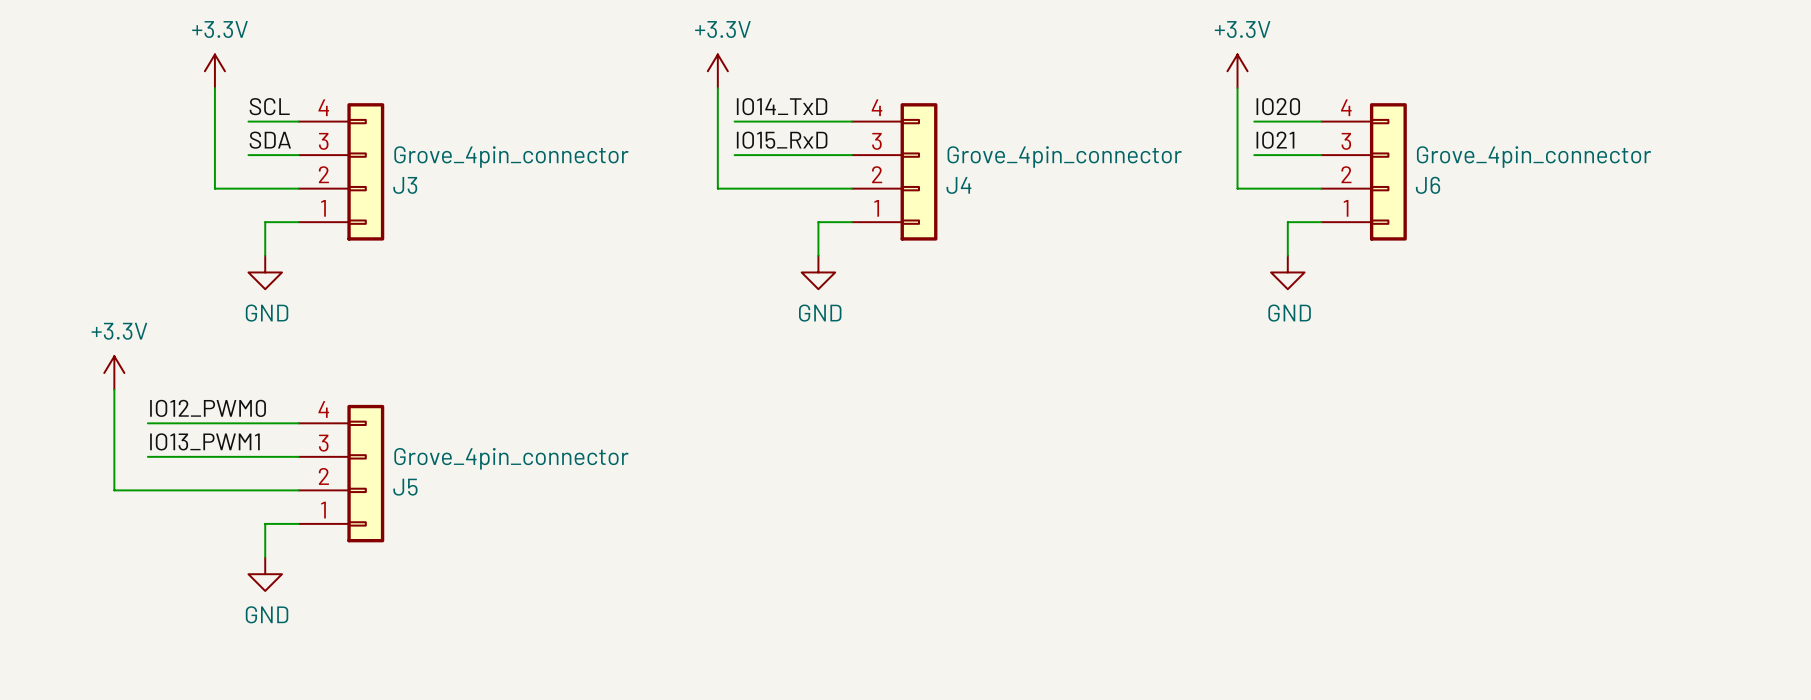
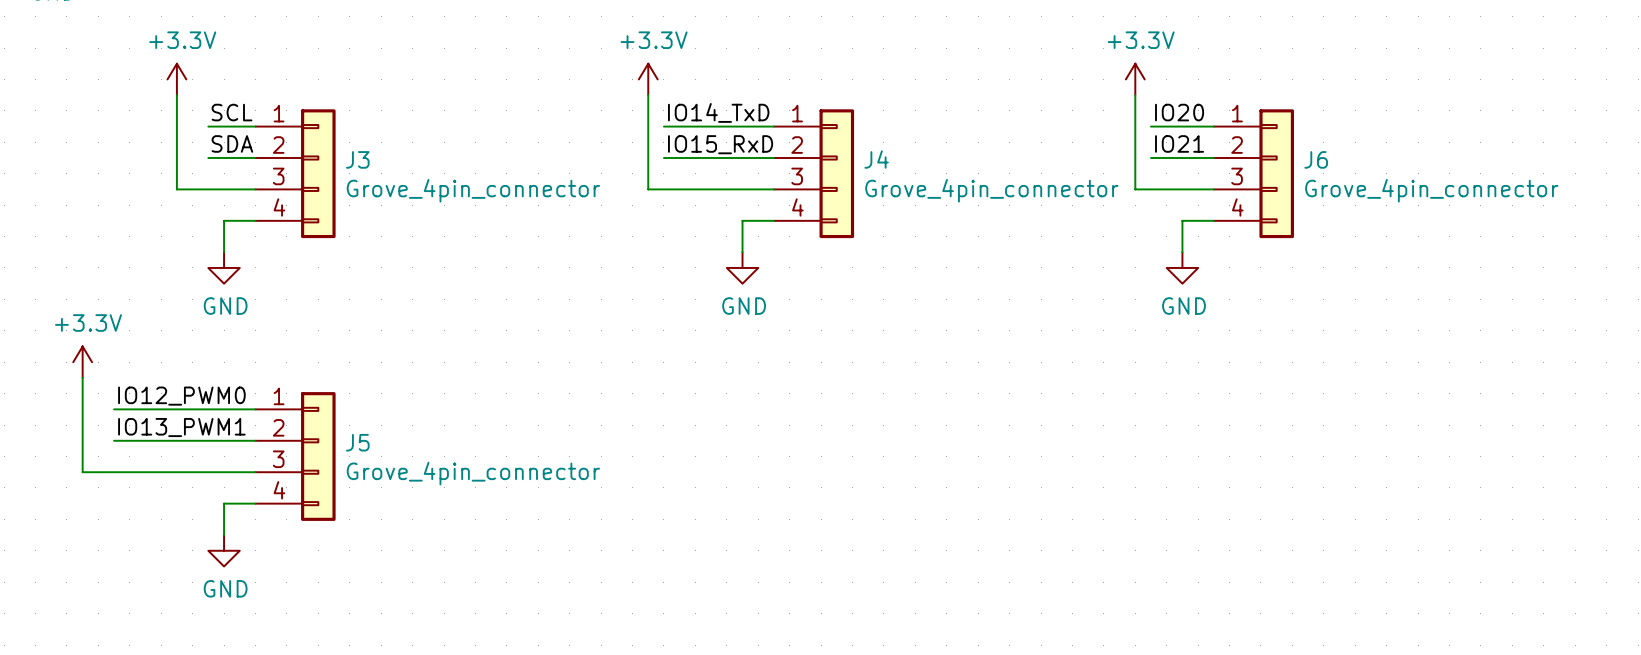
J3 flip: as is (365, 171) -> up-down (318, 173)
J4 flip: as is (919, 171) -> up-down (836, 173)
J6 flip: as is (1388, 171) -> up-down (1276, 173)
J5 flip: as is (365, 473) -> up-down (318, 456)

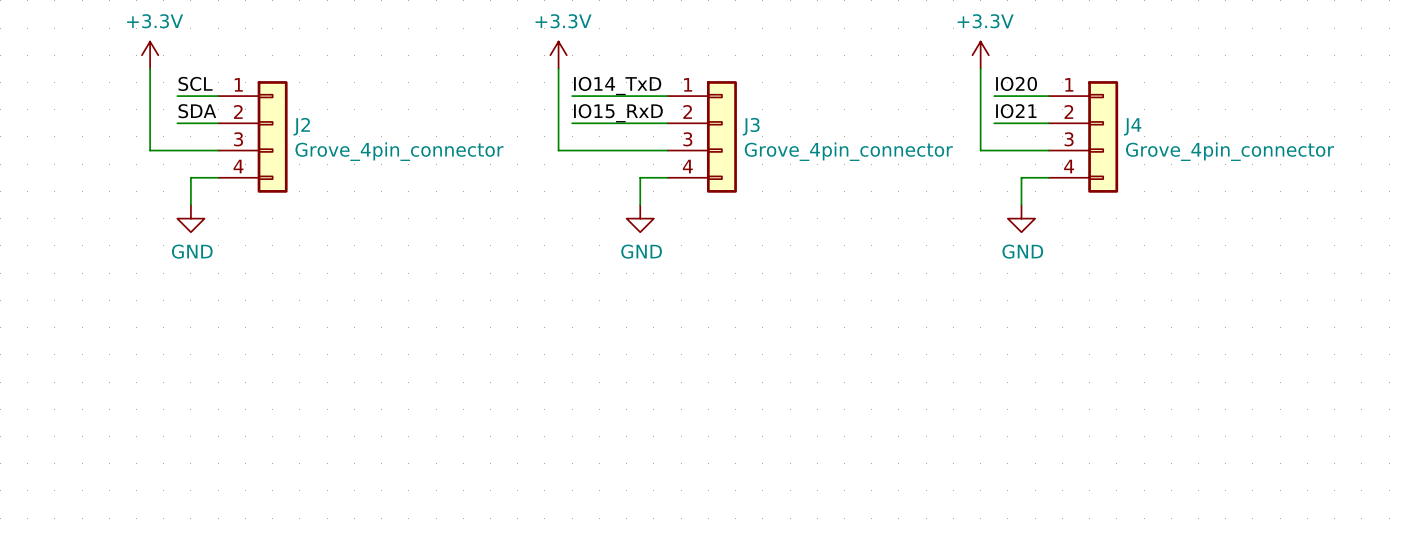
J3 name: J3 (357, 159) -> J2 (301, 126)
J4 name: J4 (876, 159) -> J3 (751, 126)
J6 name: J6 (1316, 159) -> J4 (1132, 126)
power symbol: +3.3V (82, 362) -> none
wire: (82, 377) (82, 472) (255, 472) -> none
label: IO12_PWM0 (181, 396) -> none
wire: (114, 409) (255, 409) -> none
label: IO13_PWM1 (181, 427) -> none
wire: (114, 440) (255, 440) -> none
J5: Grove_4pin_connector (295, 456) -> none
wire: (255, 503) (224, 503) (224, 535) -> none
power symbol: GND (224, 550) -> none

